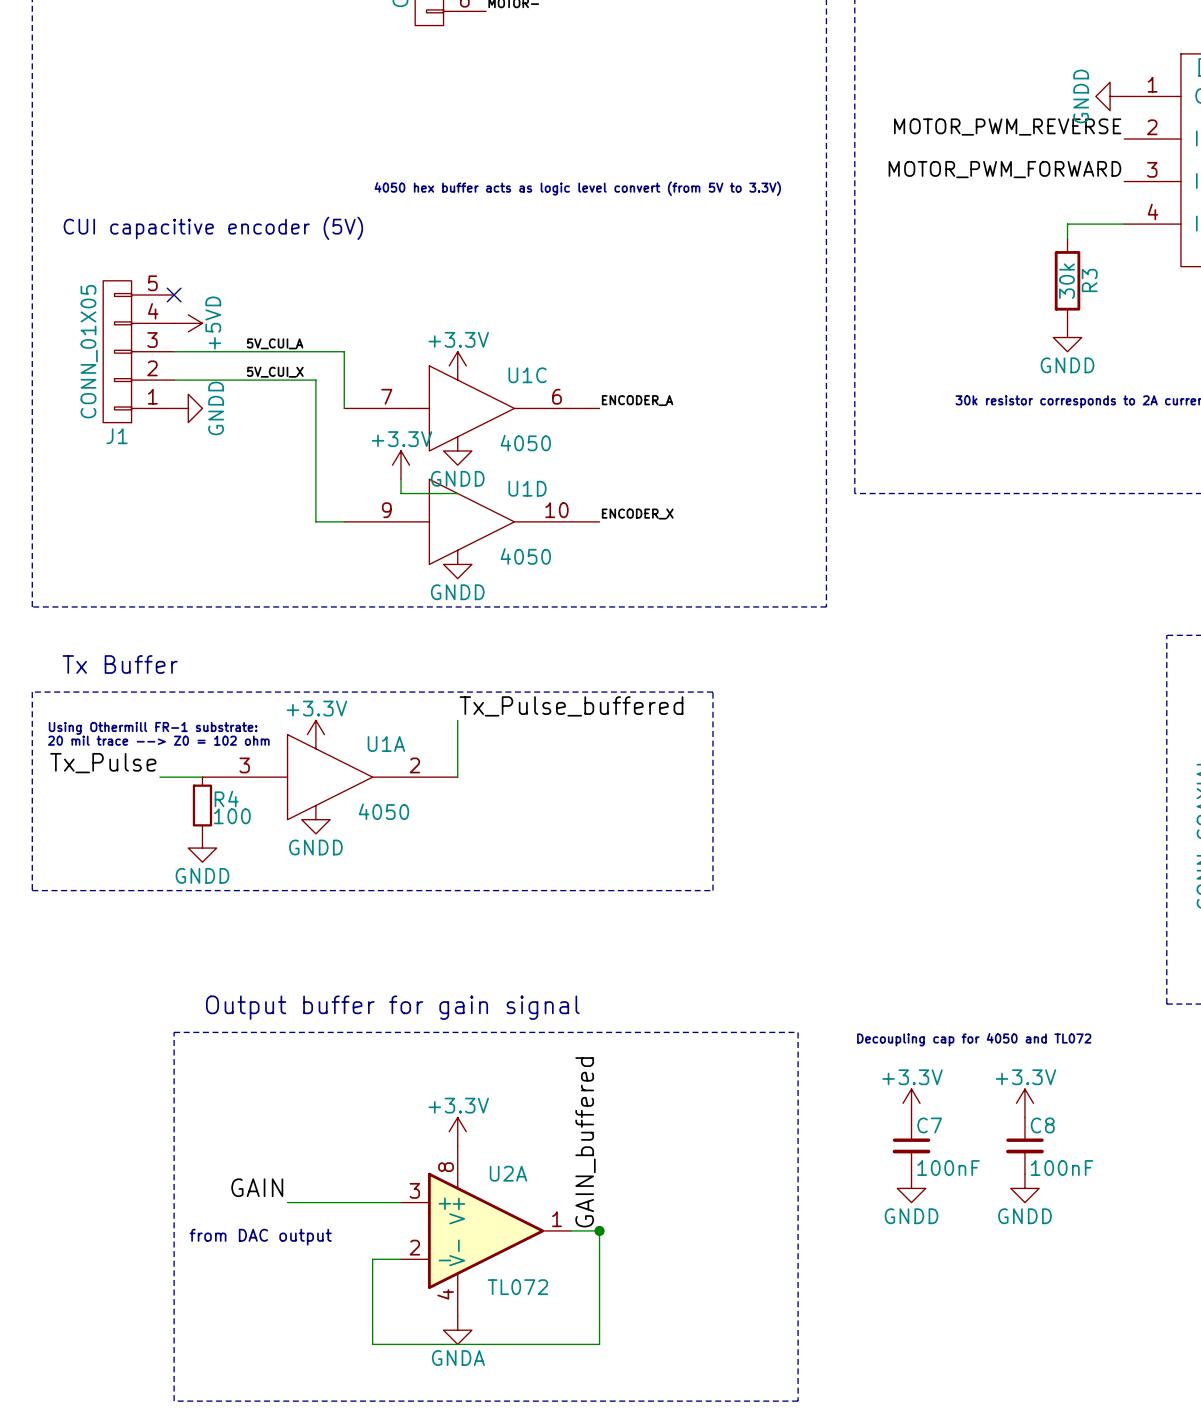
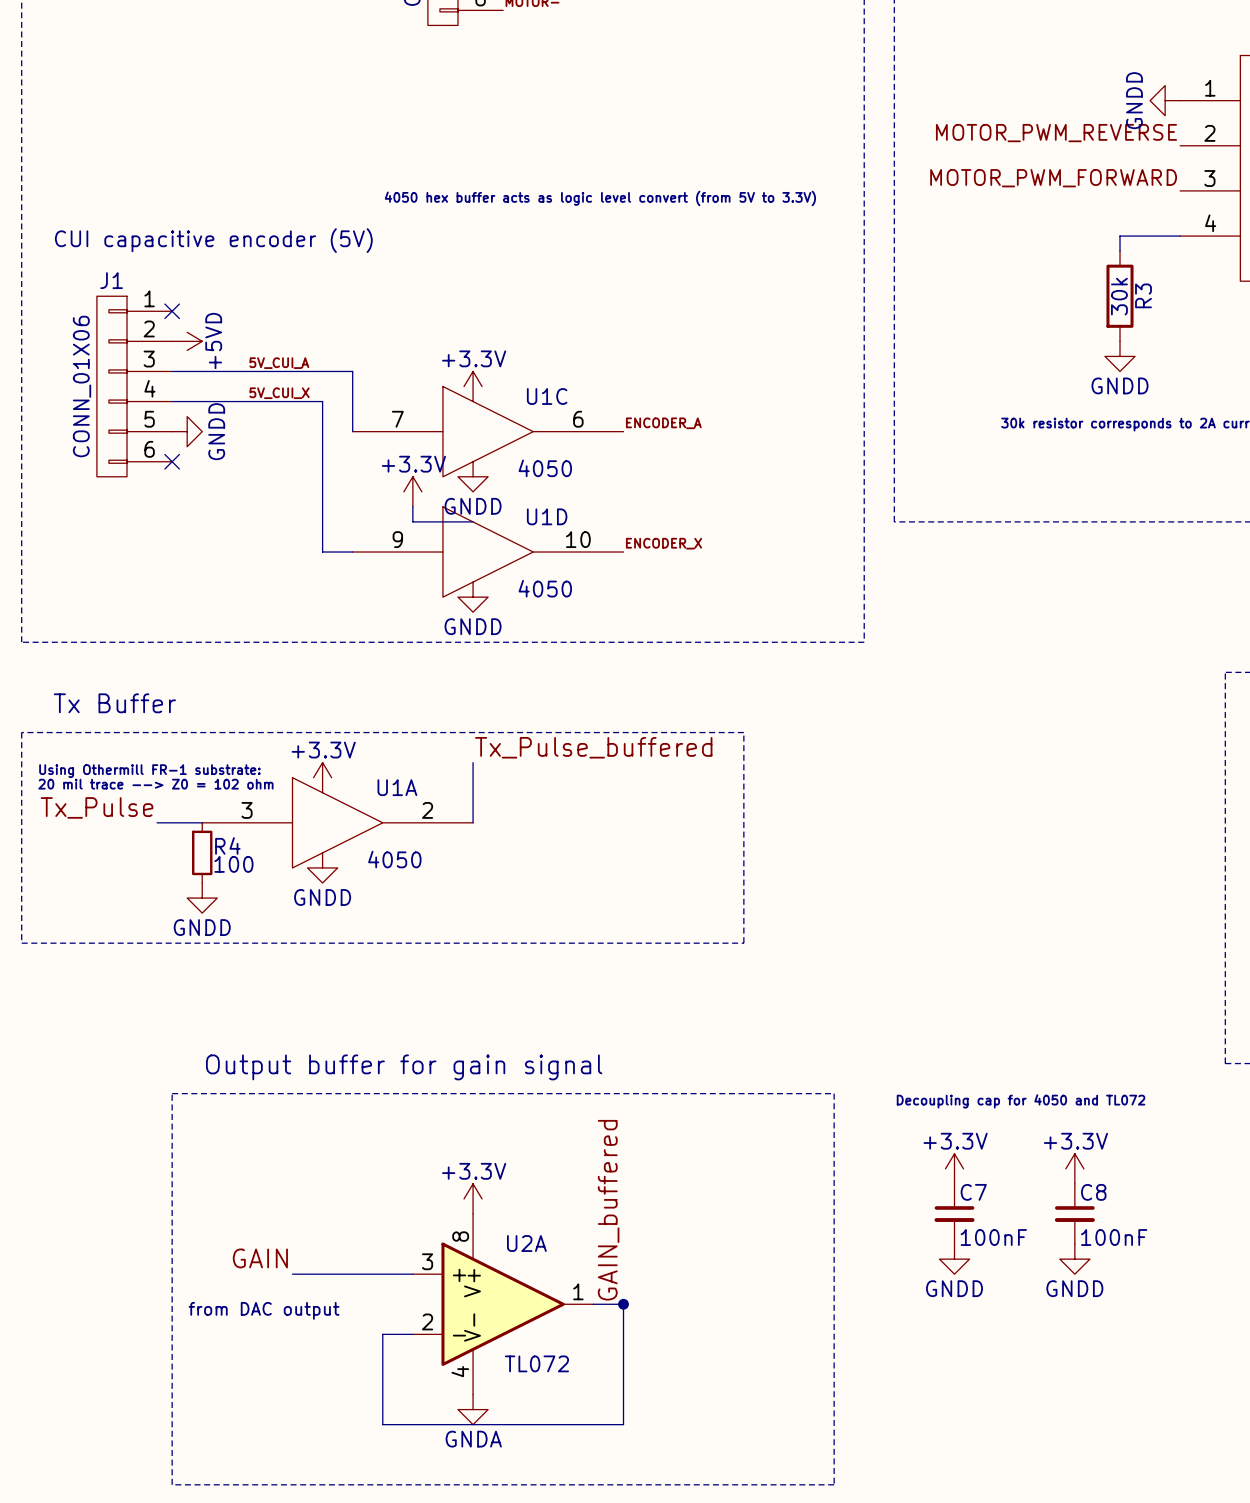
J1 symbol: [103, 280, 175, 423] -> [96, 296, 173, 477]
J1 value: CONN_01X05 (89, 351) -> CONN_01X06 (82, 386)
J1 name position: J1 (117, 436) -> J1 (111, 280)
no-connect mark: none -> (172, 461)

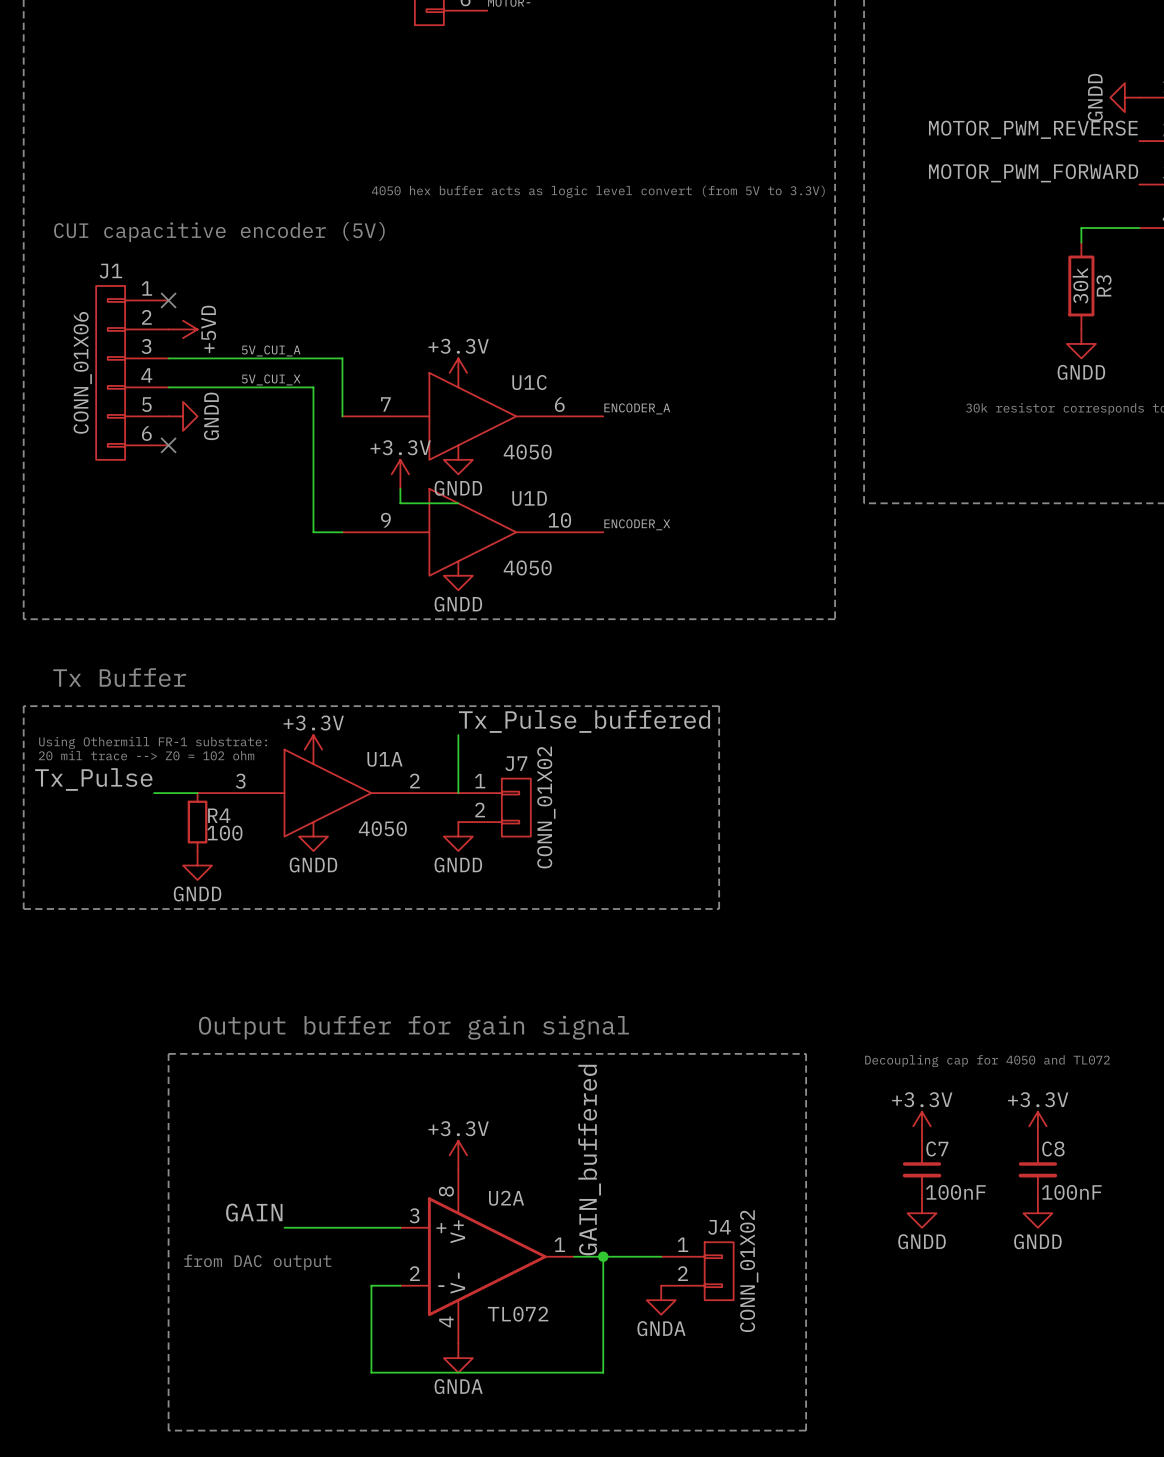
J7: none -> CONN_01X02 (494, 807)
power symbol: none -> GNDD (458, 836)
wire: none -> (603, 1256) (661, 1256)
J4: none -> CONN_01X02 (697, 1271)
power symbol: none -> GNDA (661, 1300)

